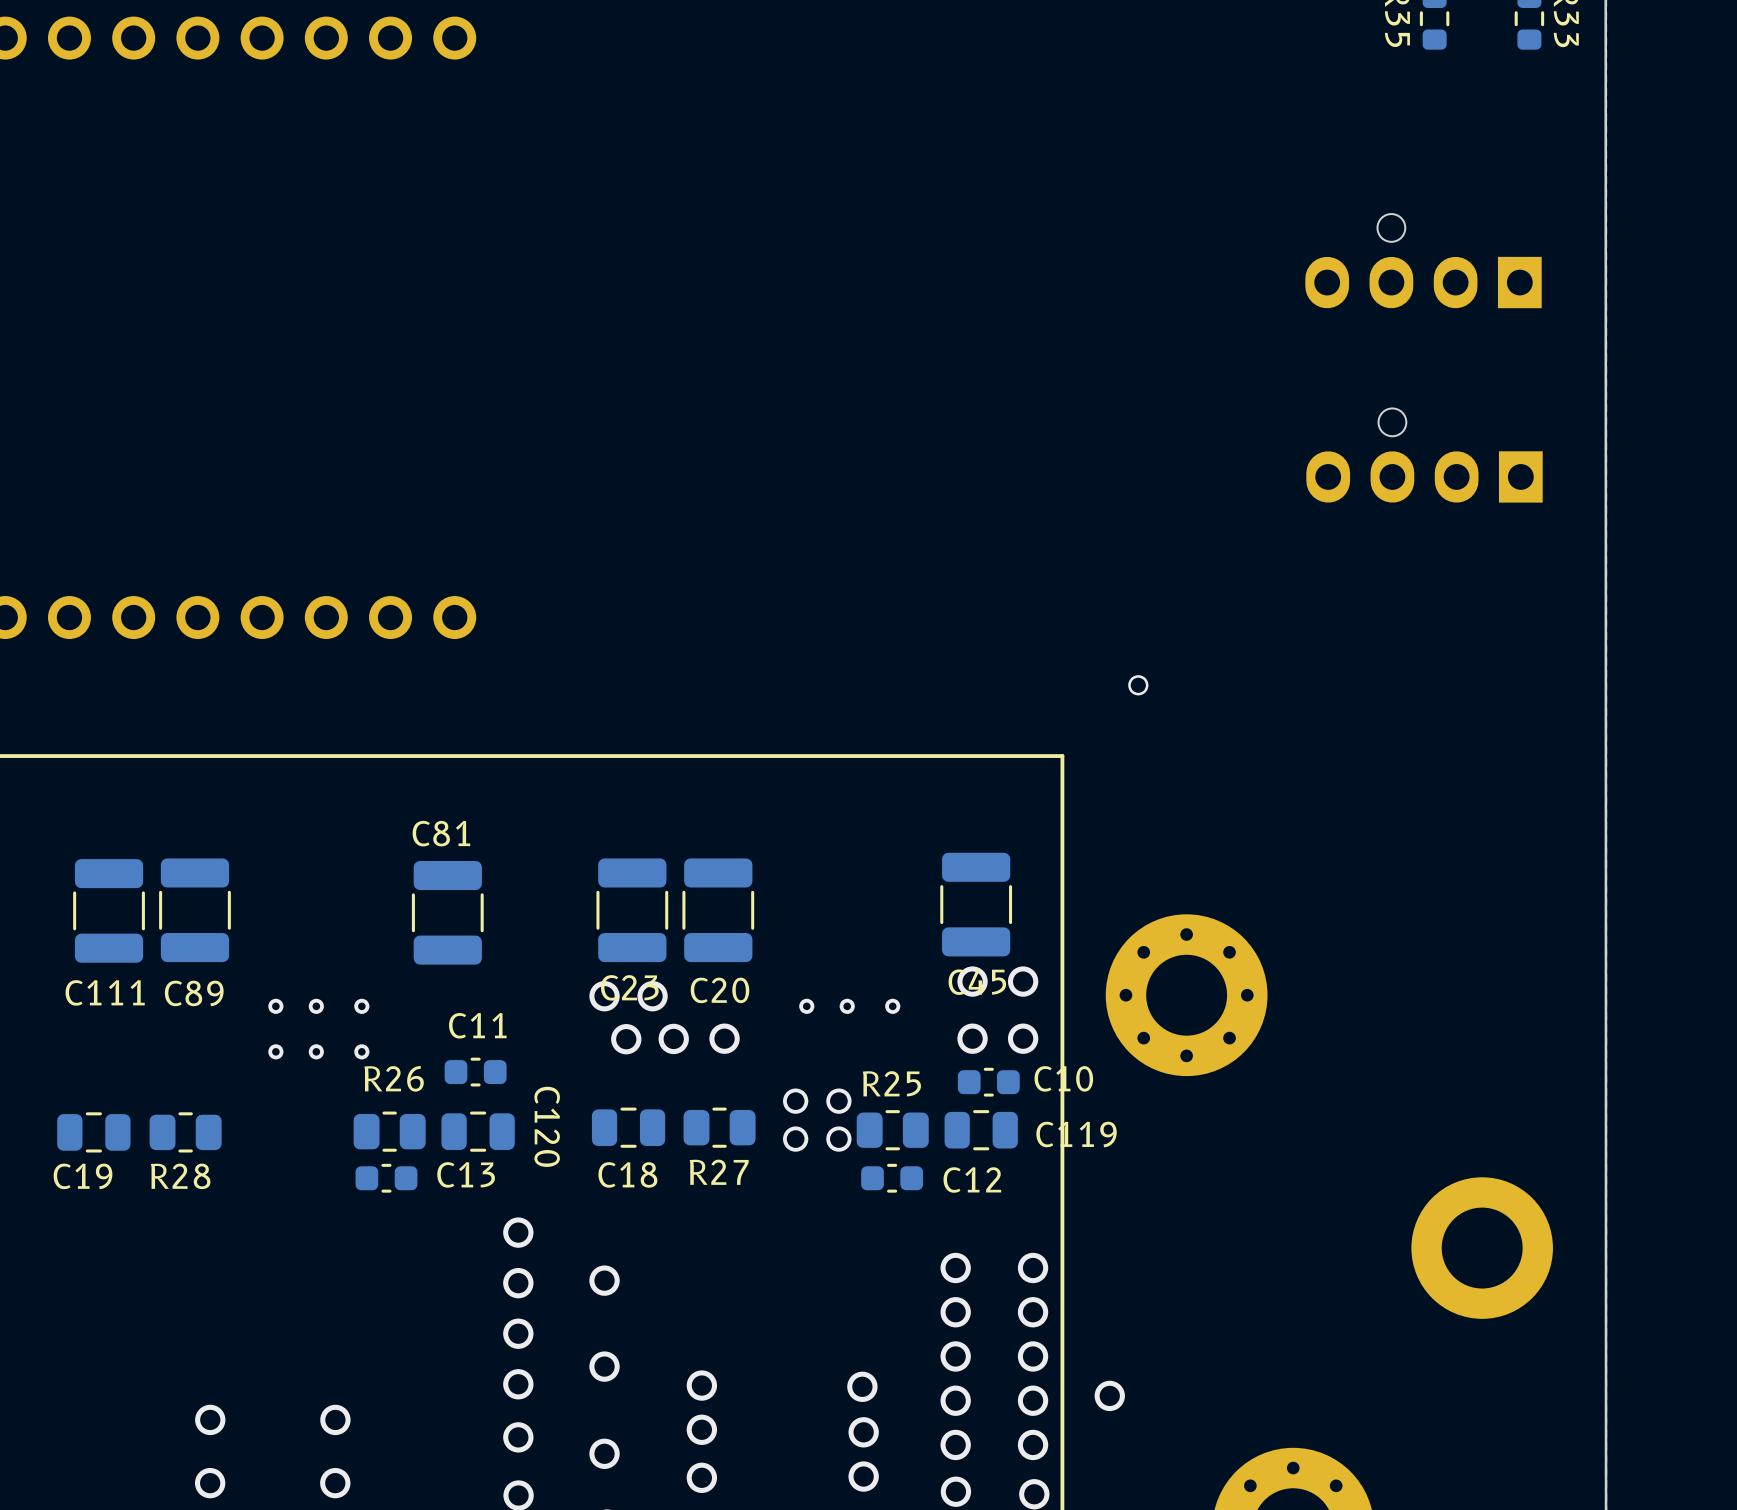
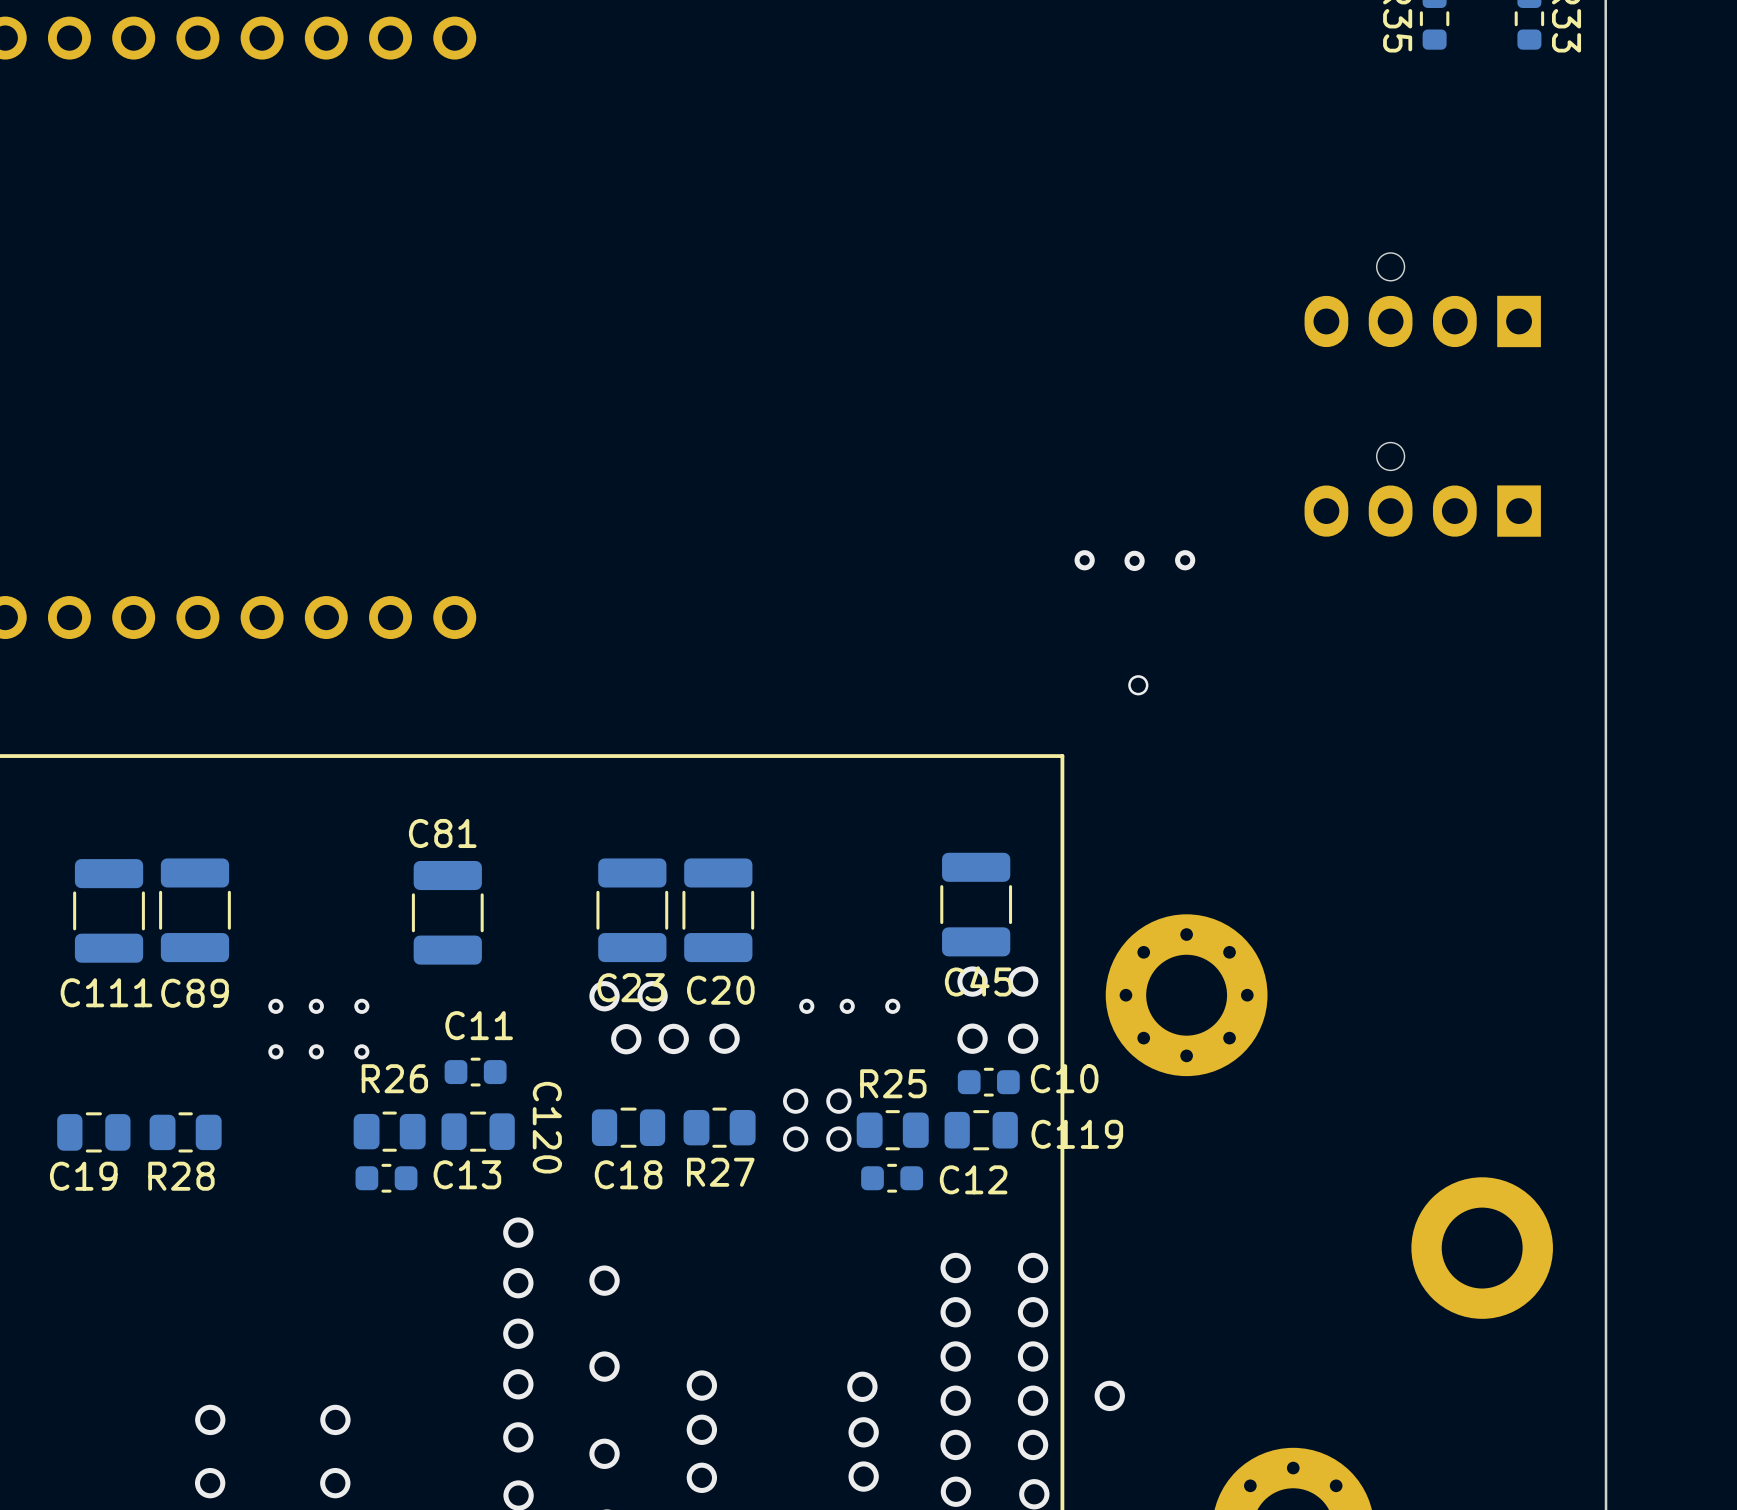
part position: (1423, 261) -> (1422, 300)
part position: (1424, 455) -> (1422, 489)
via: none -> (1084, 560)
via: none -> (1134, 560)
via: none -> (1185, 560)

